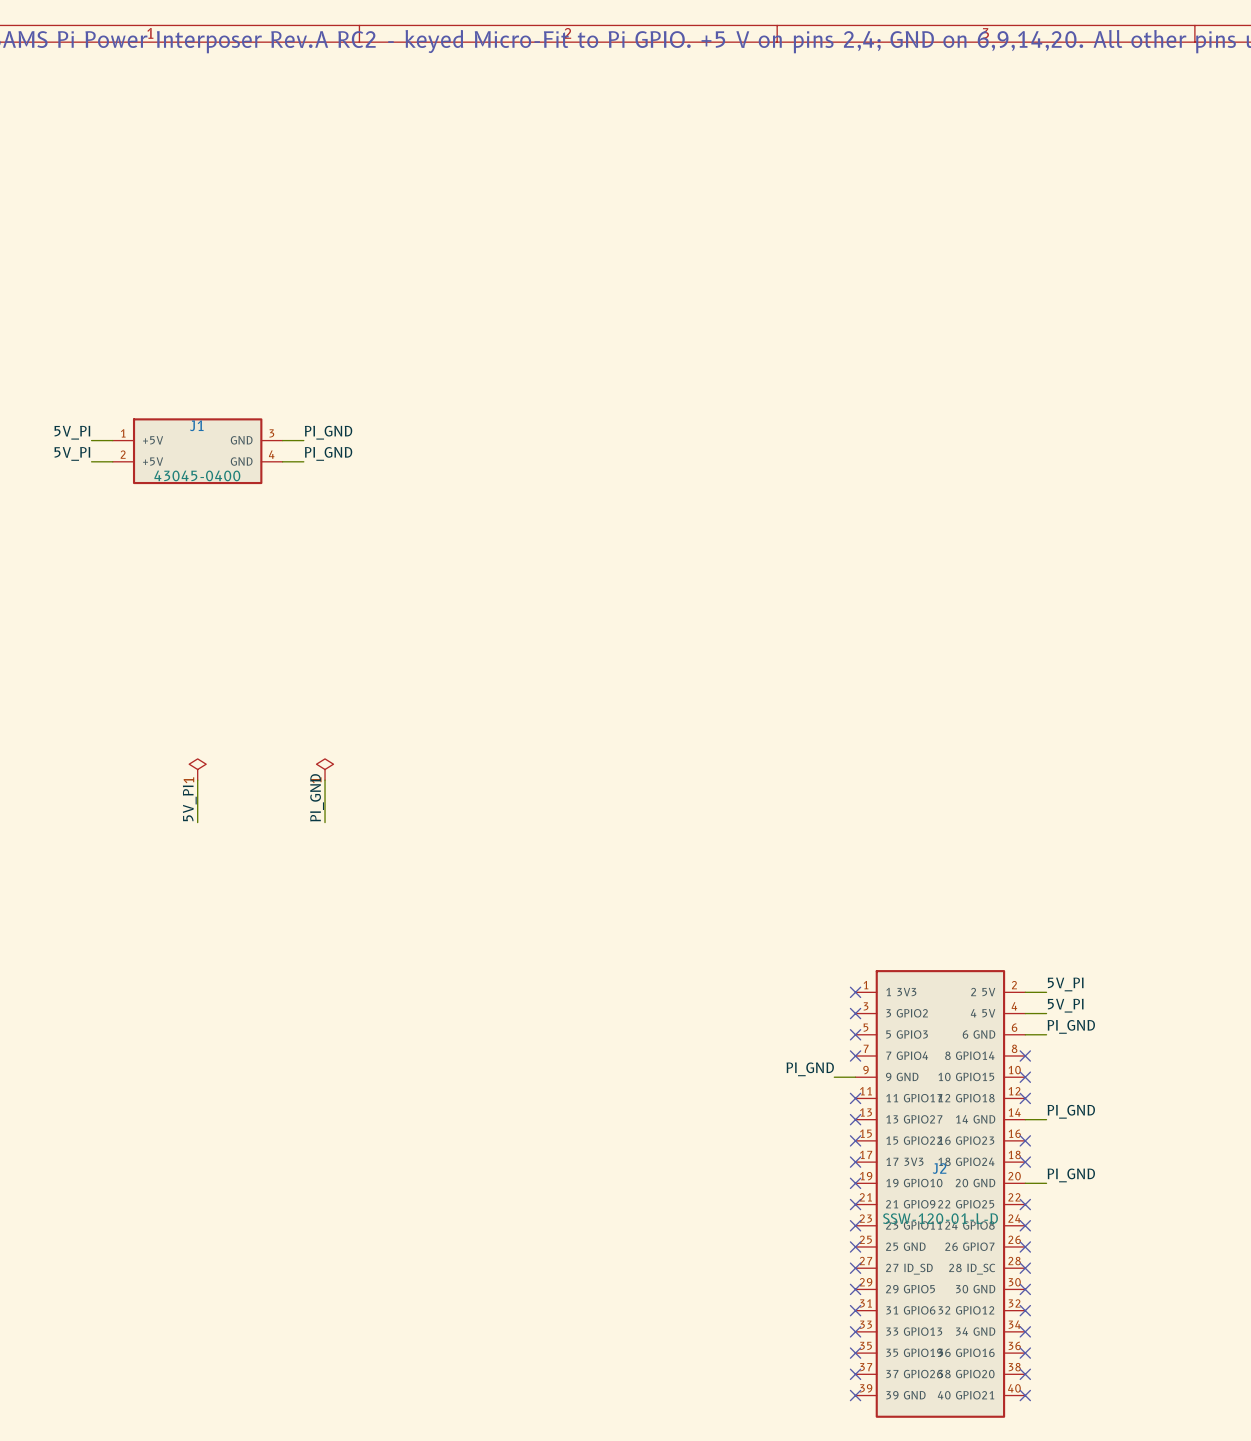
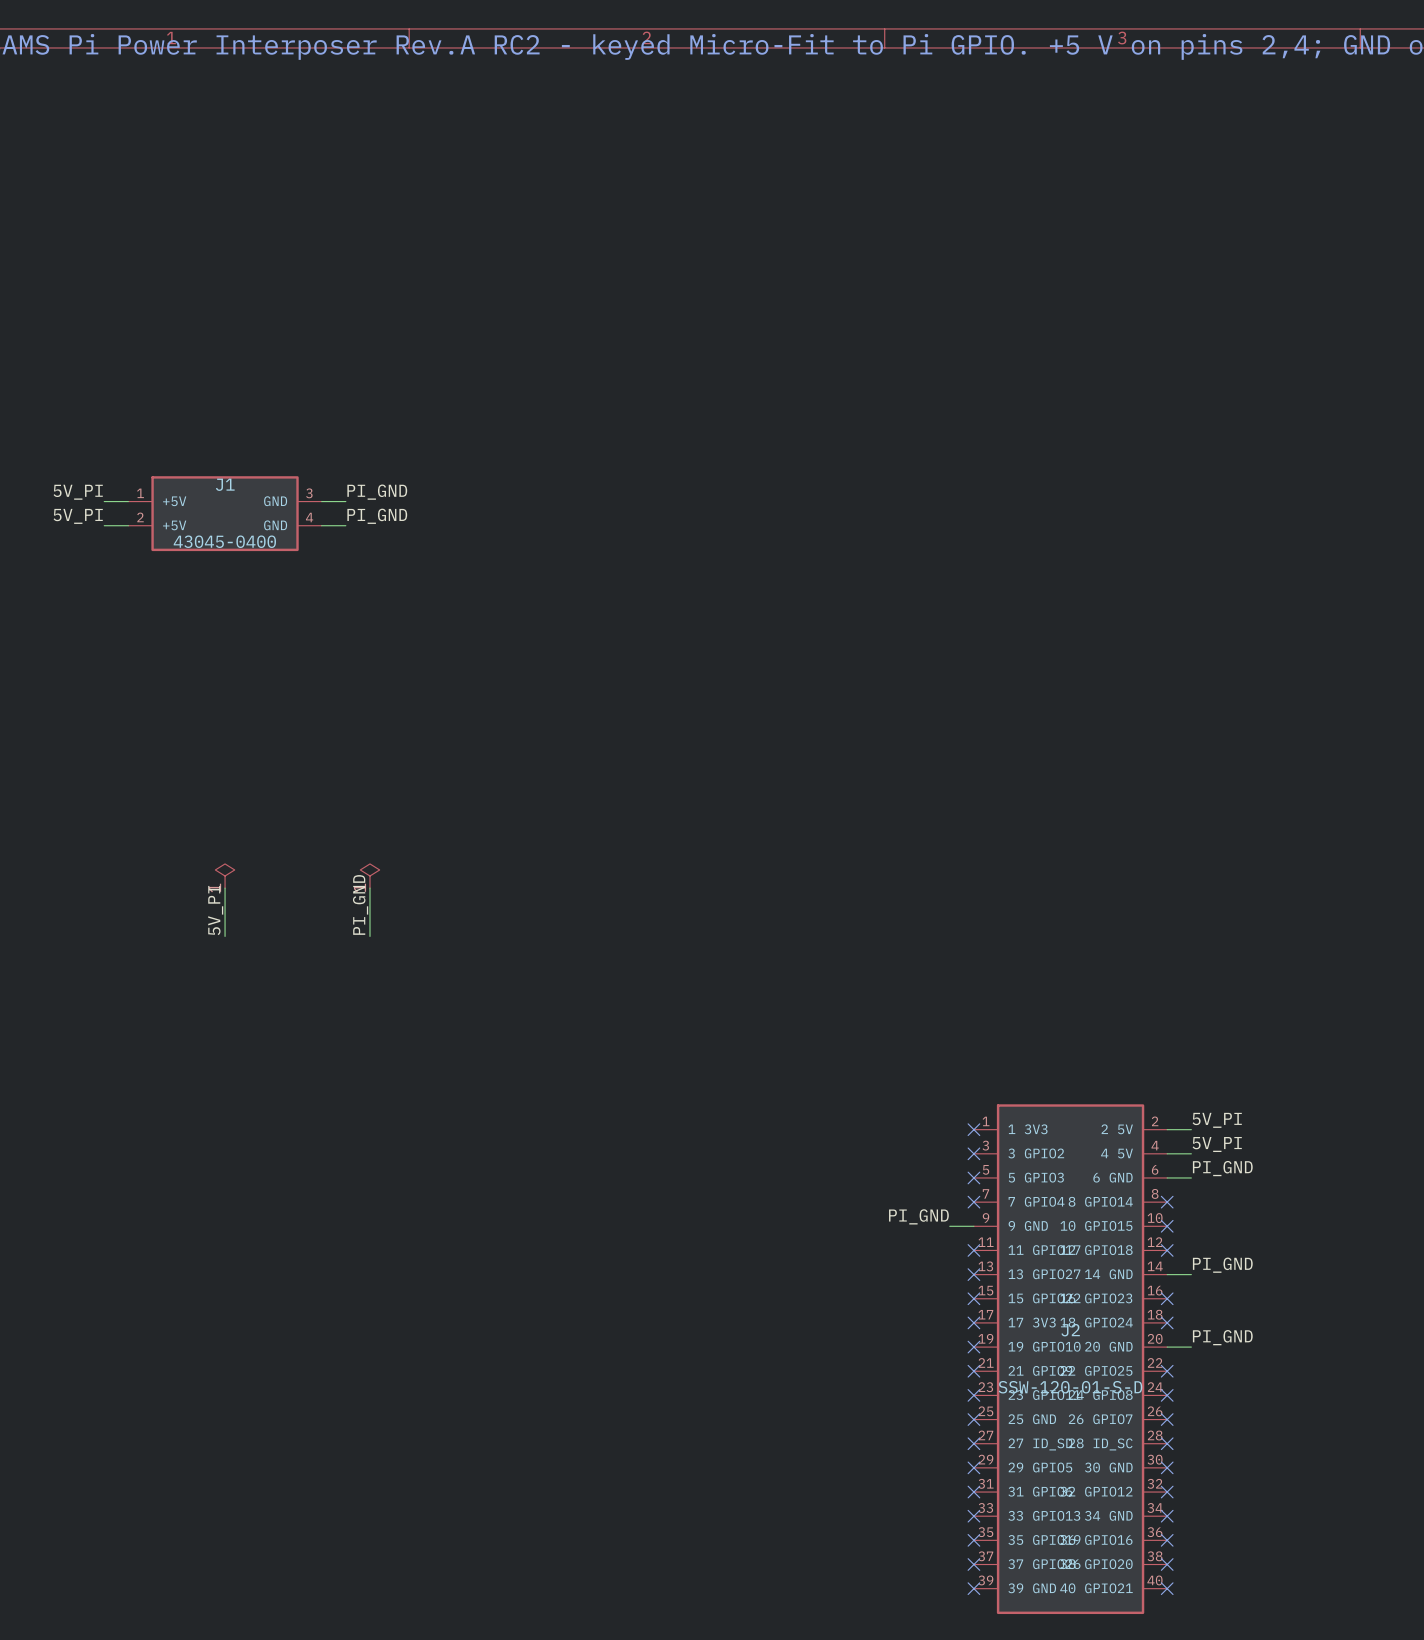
J2 value: SSW-120-01-L-D (940, 1218) -> SSW-120-01-S-D (1070, 1387)

